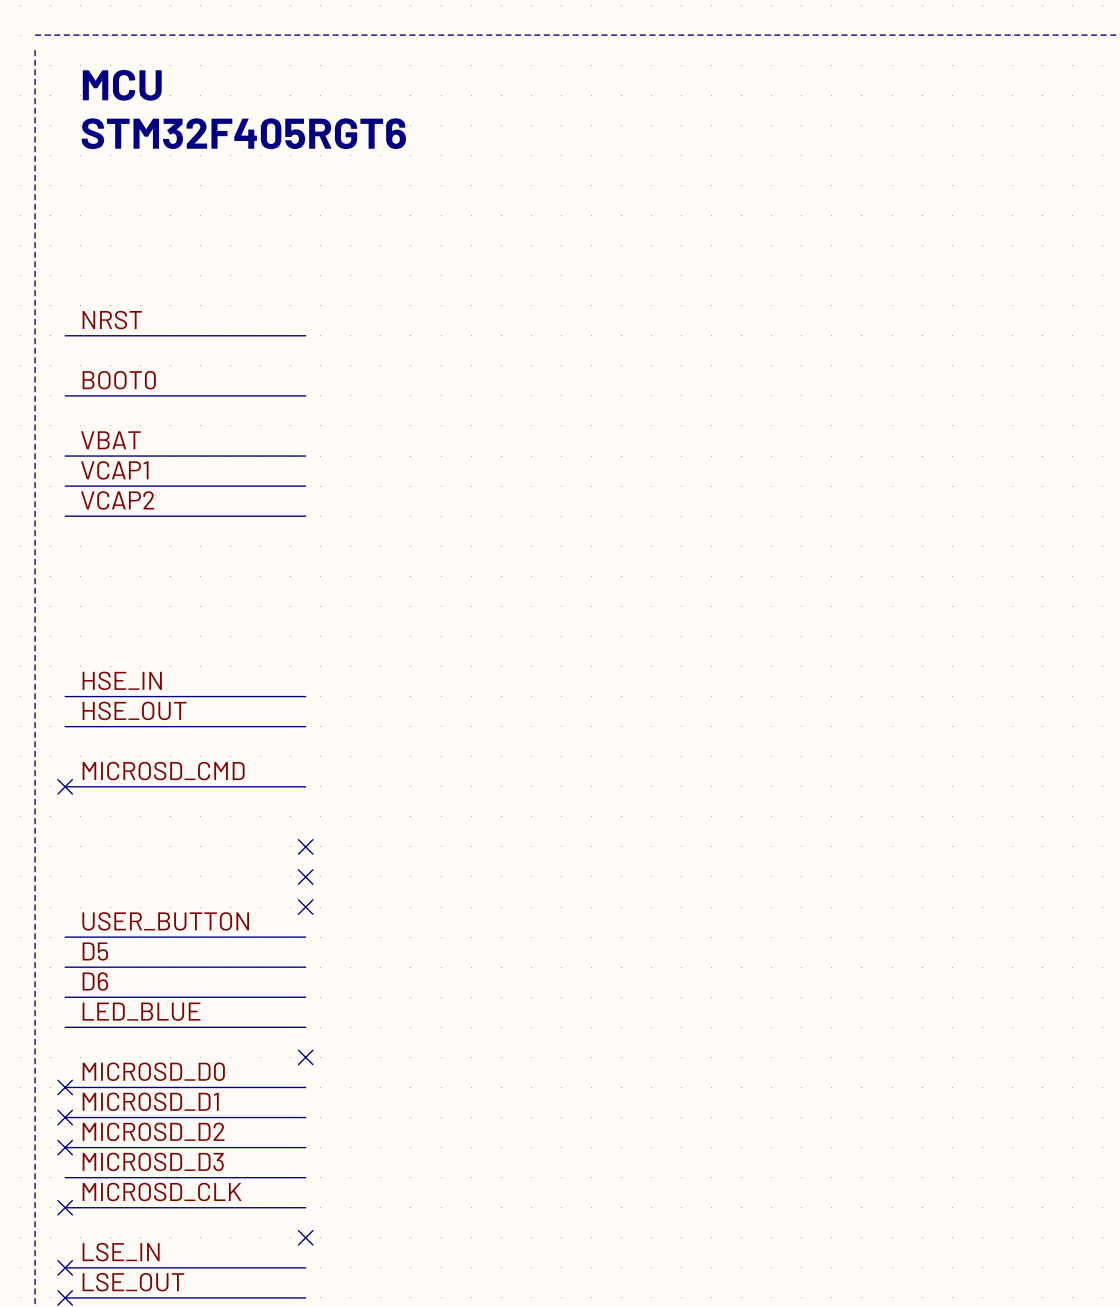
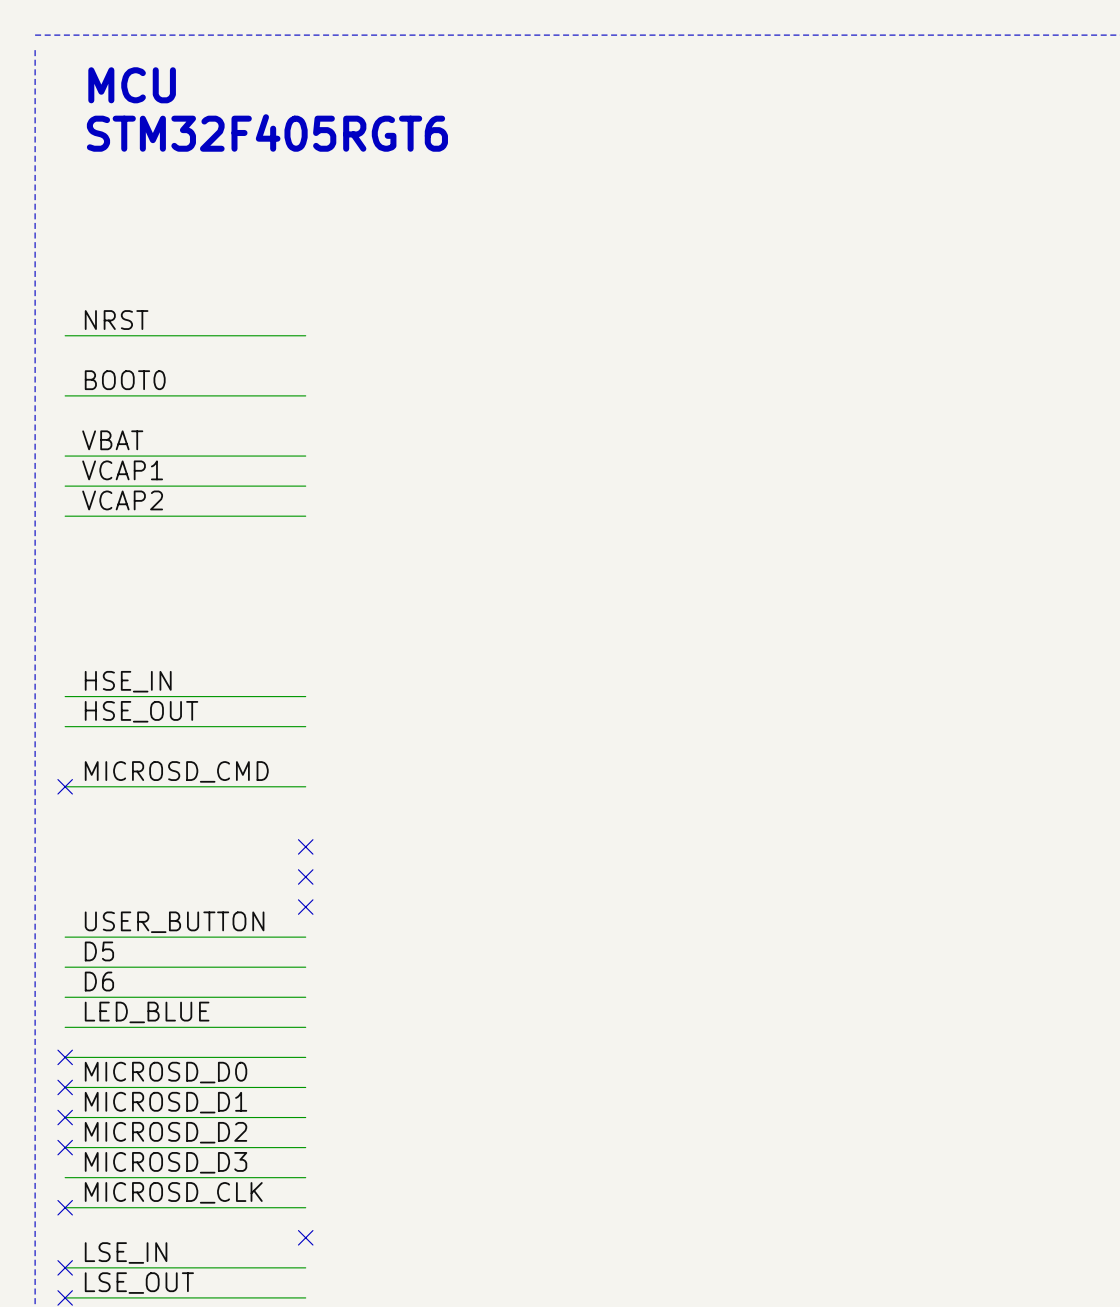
wire: none -> (65, 1057) (305, 1057)
no-connect mark: none -> (65, 1057)
no-connect mark: (305, 1057) -> none

